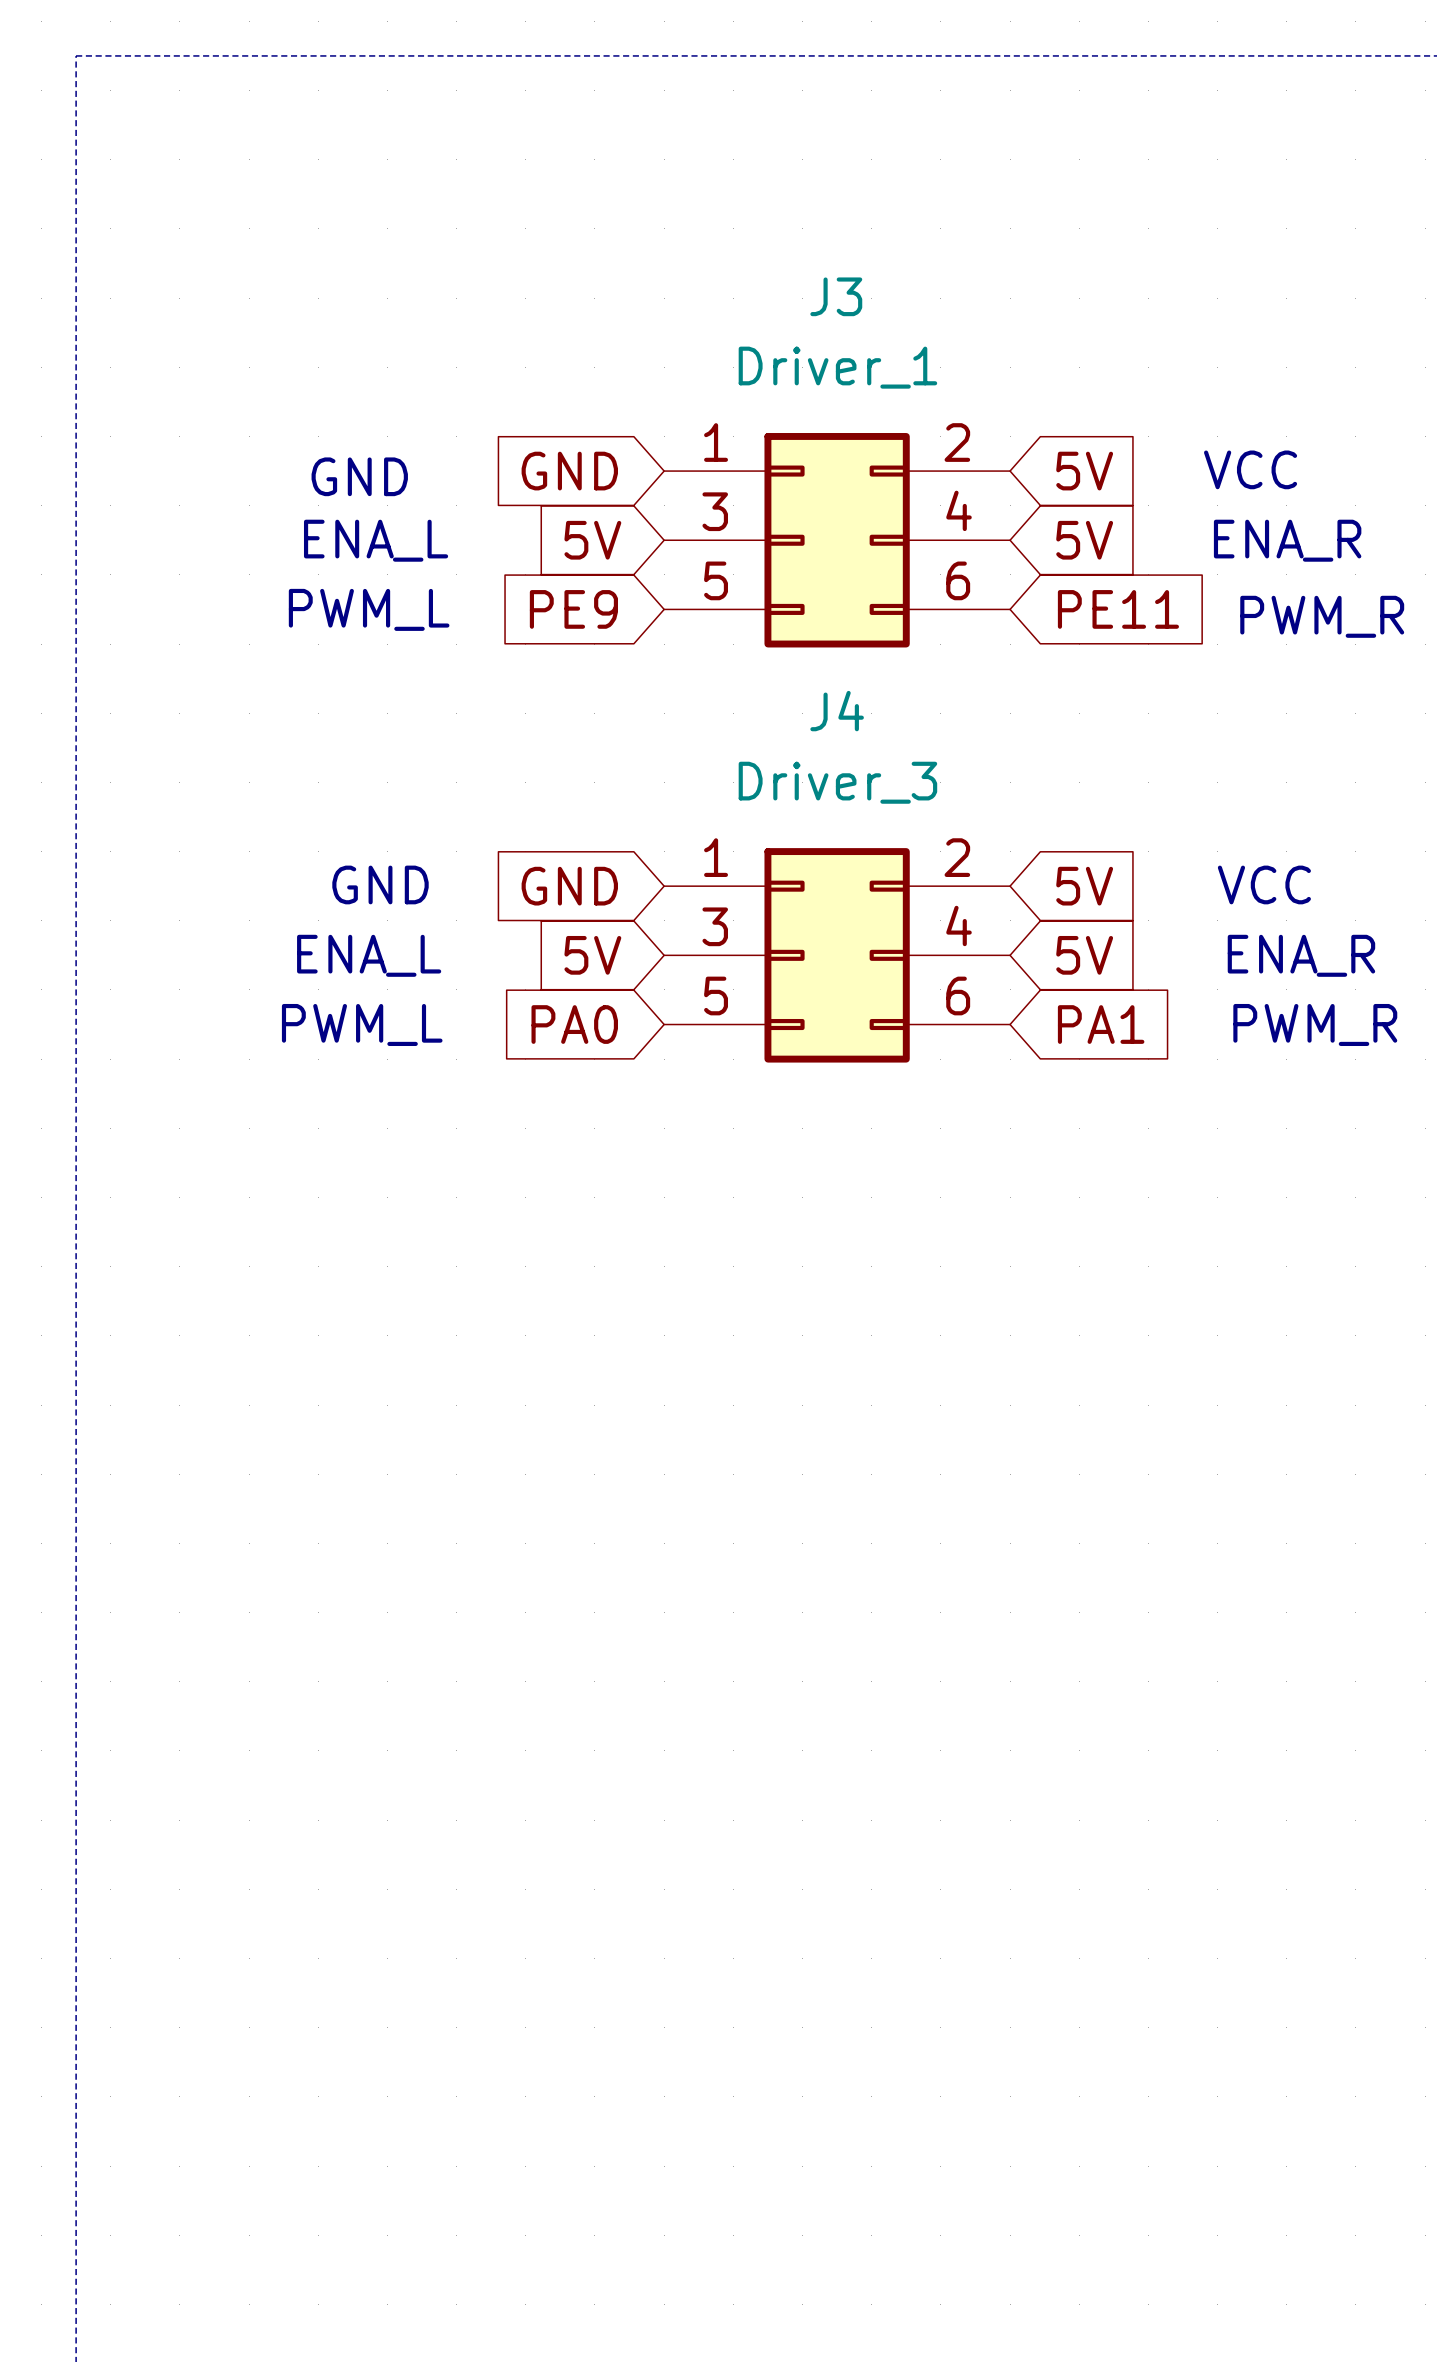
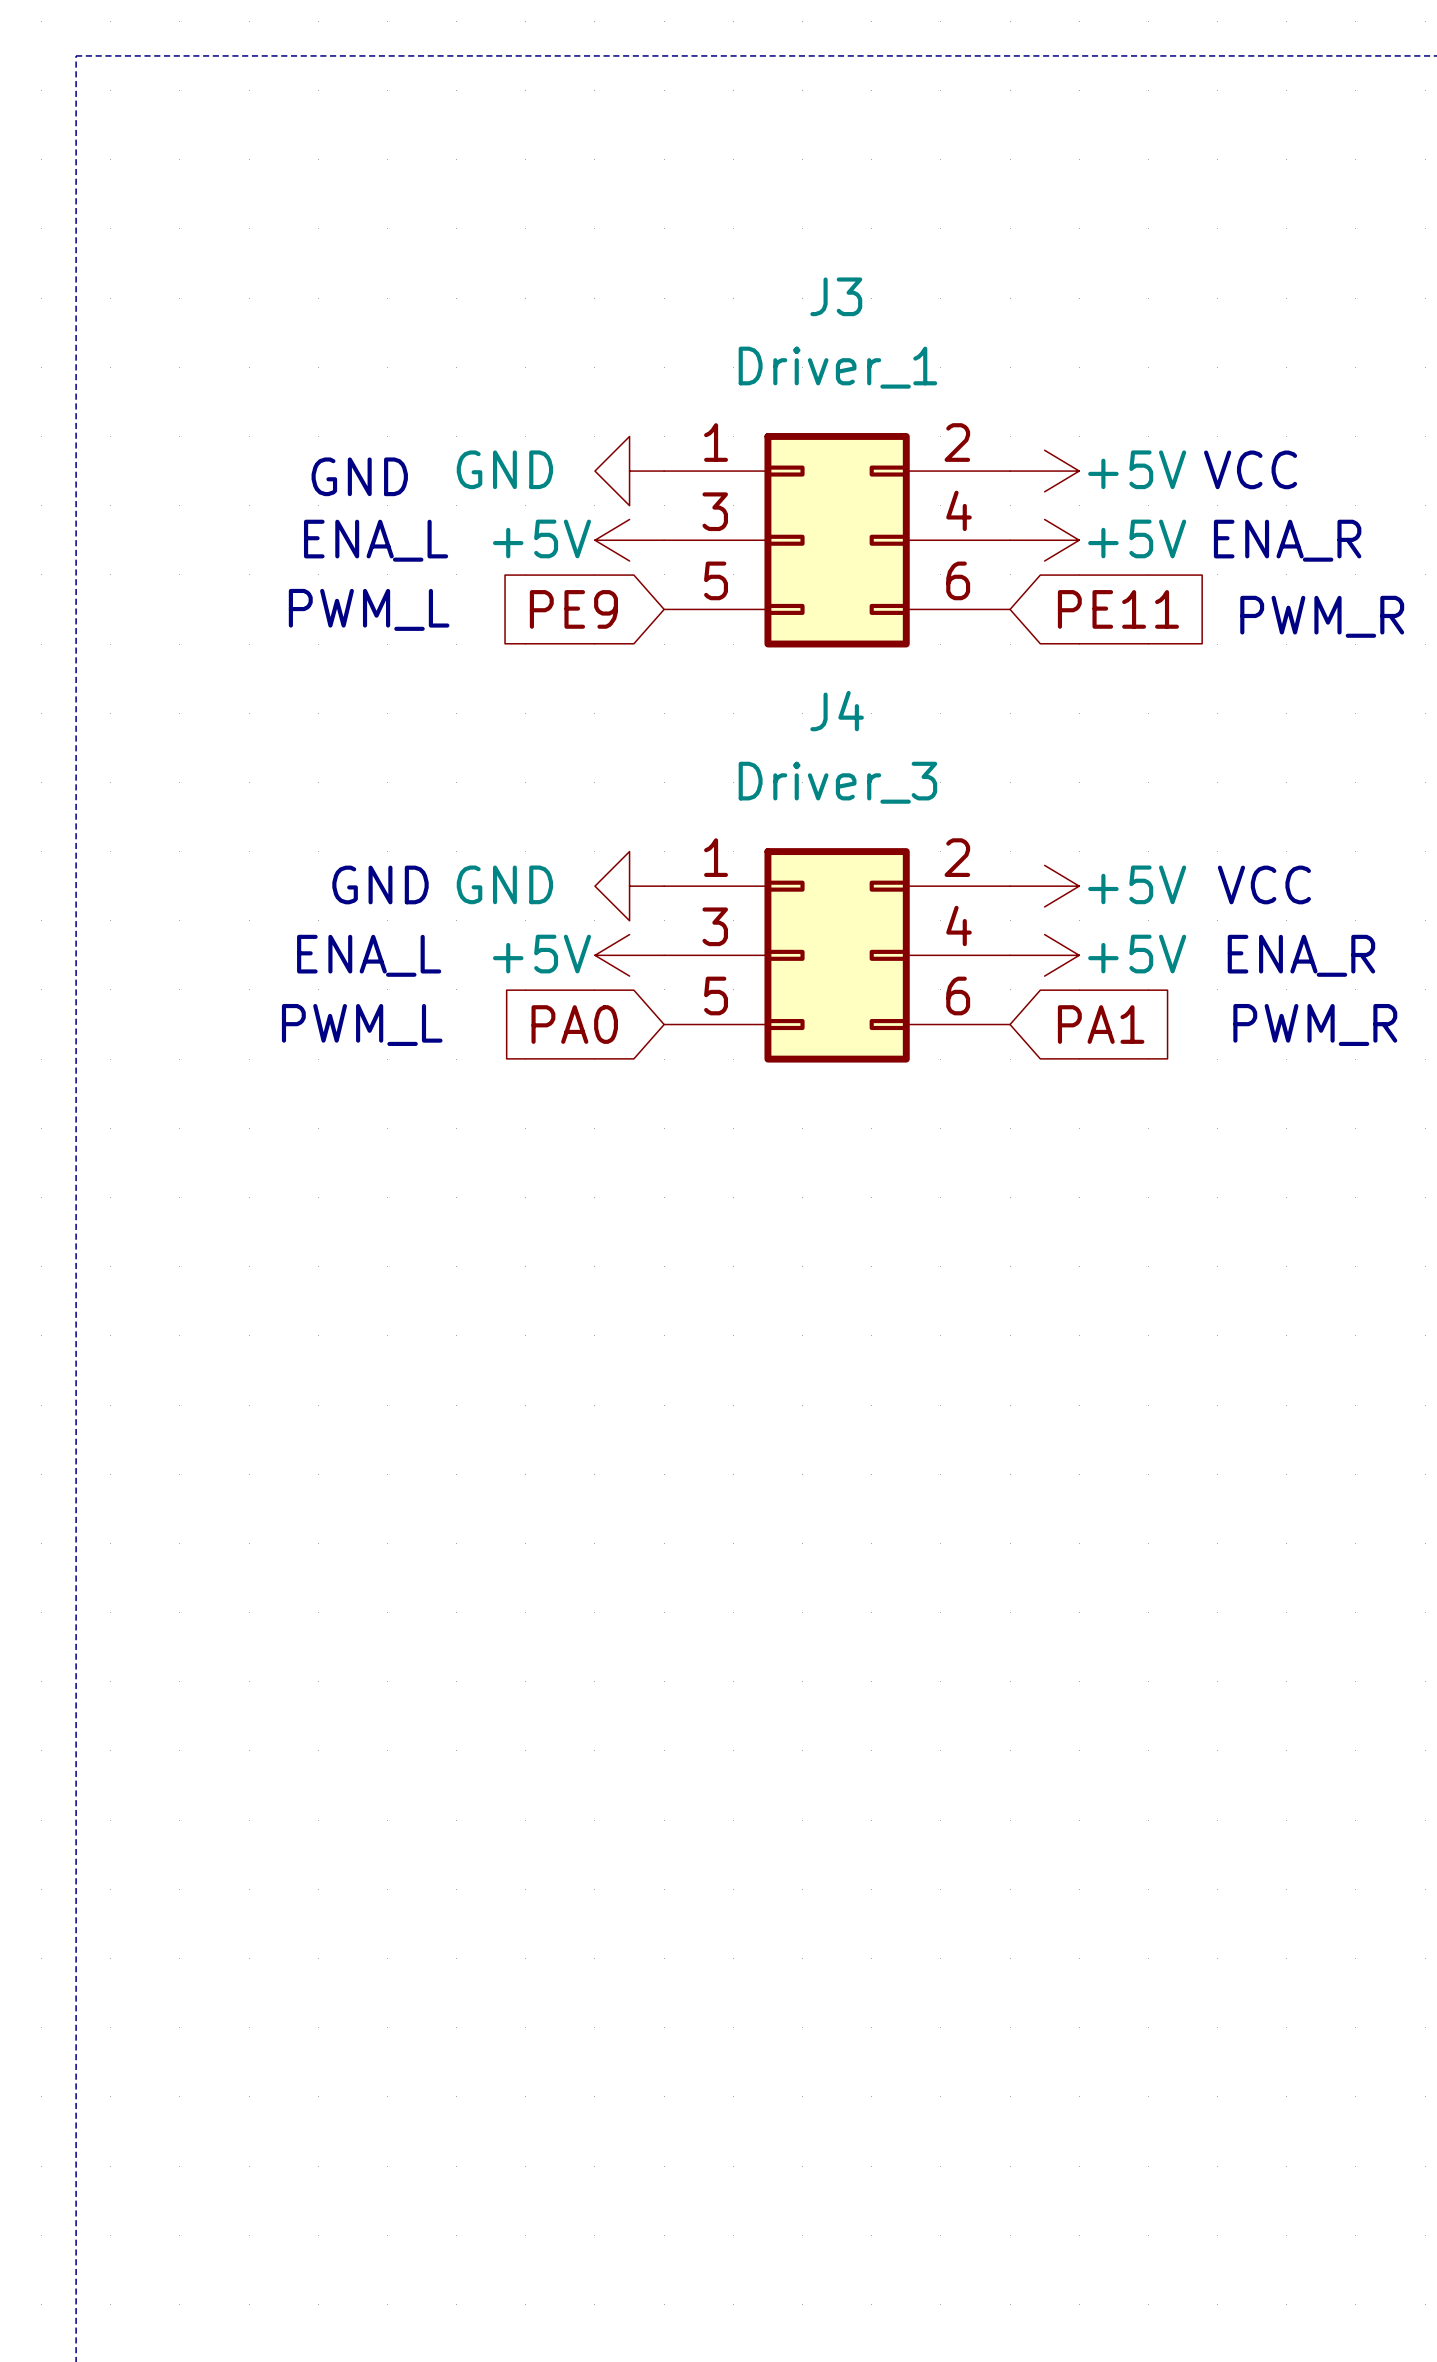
global label: GND (569, 471) -> none
power symbol: none -> GND (629, 471)
power symbol: none -> +5V (1044, 471)
global label: 5V (1084, 471) -> none
global label: 5V (592, 540) -> none
power symbol: none -> +5V (629, 540)
power symbol: none -> +5V (1044, 540)
global label: 5V (1084, 540) -> none
global label: GND (569, 886) -> none
power symbol: none -> GND (629, 886)
power symbol: none -> +5V (1044, 886)
global label: 5V (1084, 886) -> none
global label: 5V (592, 955) -> none
power symbol: none -> +5V (629, 955)
power symbol: none -> +5V (1044, 955)
global label: 5V (1084, 955) -> none

